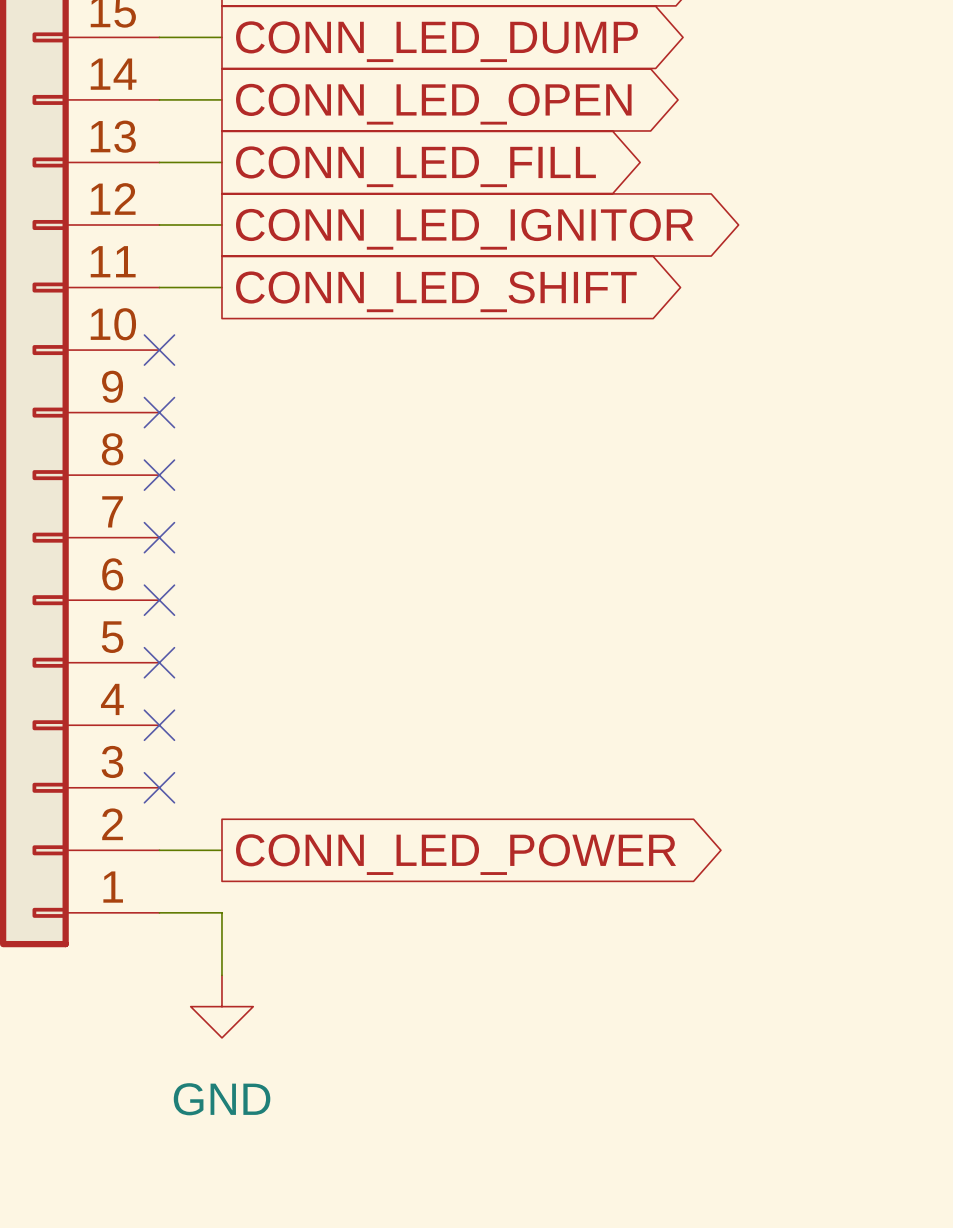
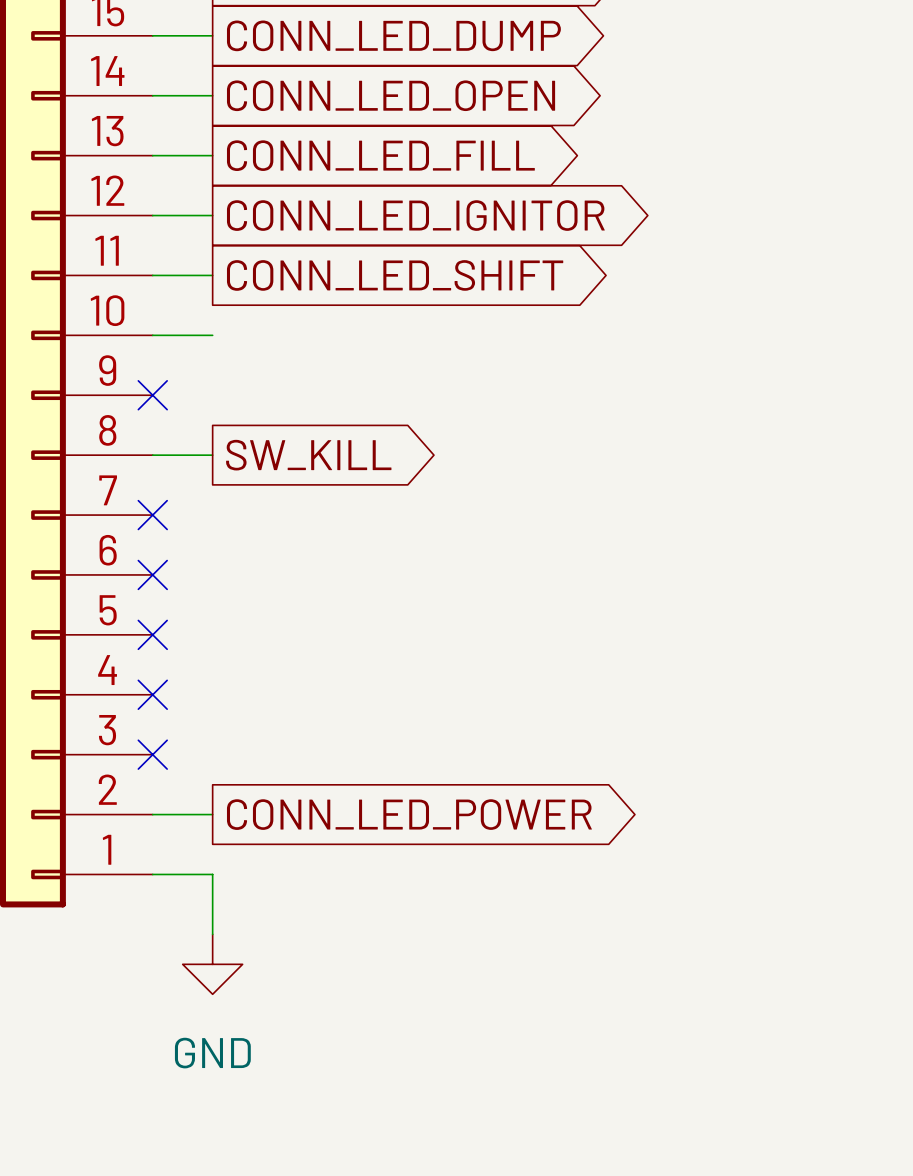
wire: none -> (152, 335) (212, 335)
no-connect mark: (159, 350) -> none
wire: none -> (152, 455) (212, 455)
no-connect mark: (159, 475) -> none
global label: none -> SW_KILL (308, 455)

